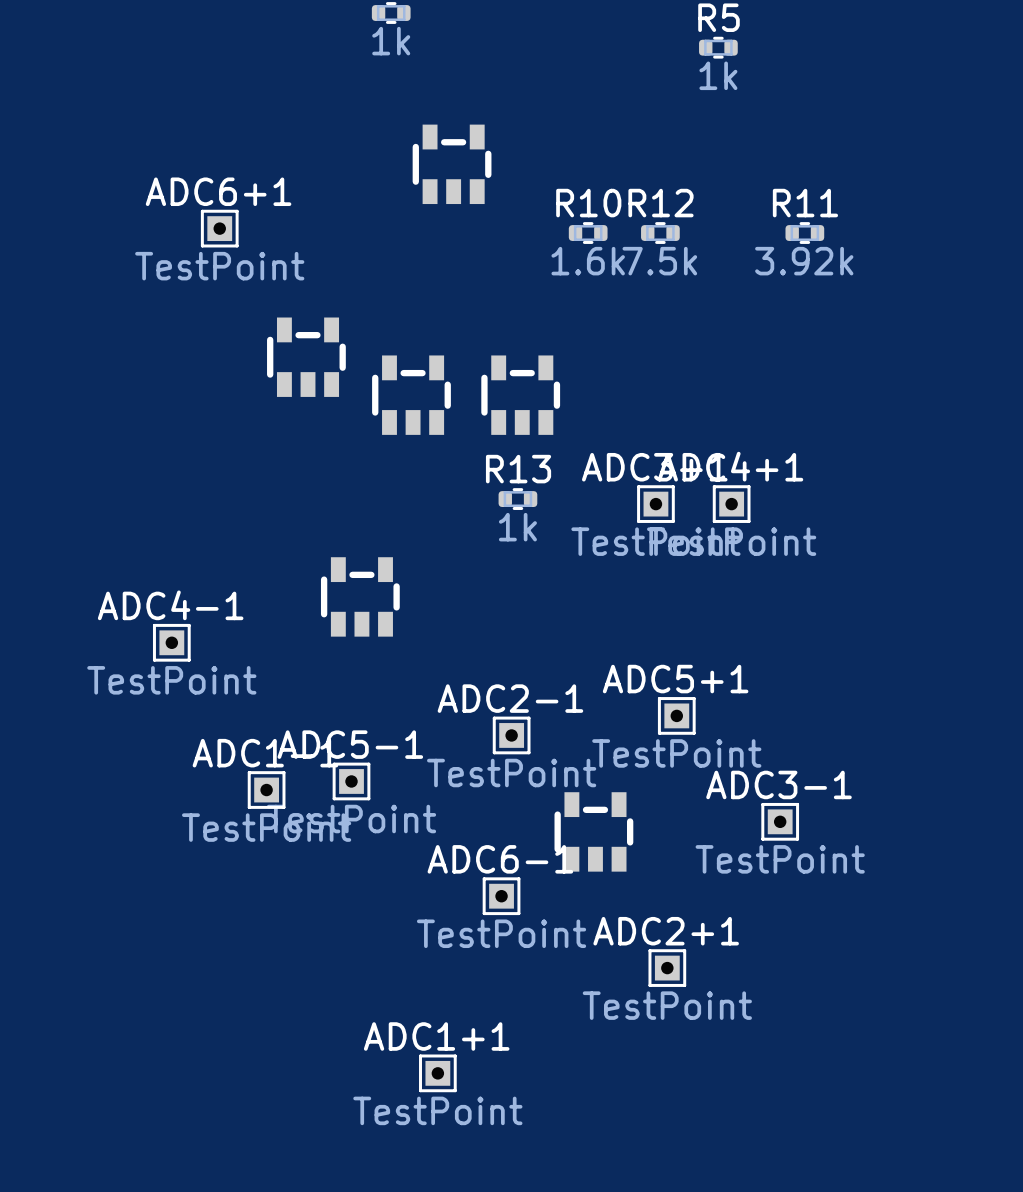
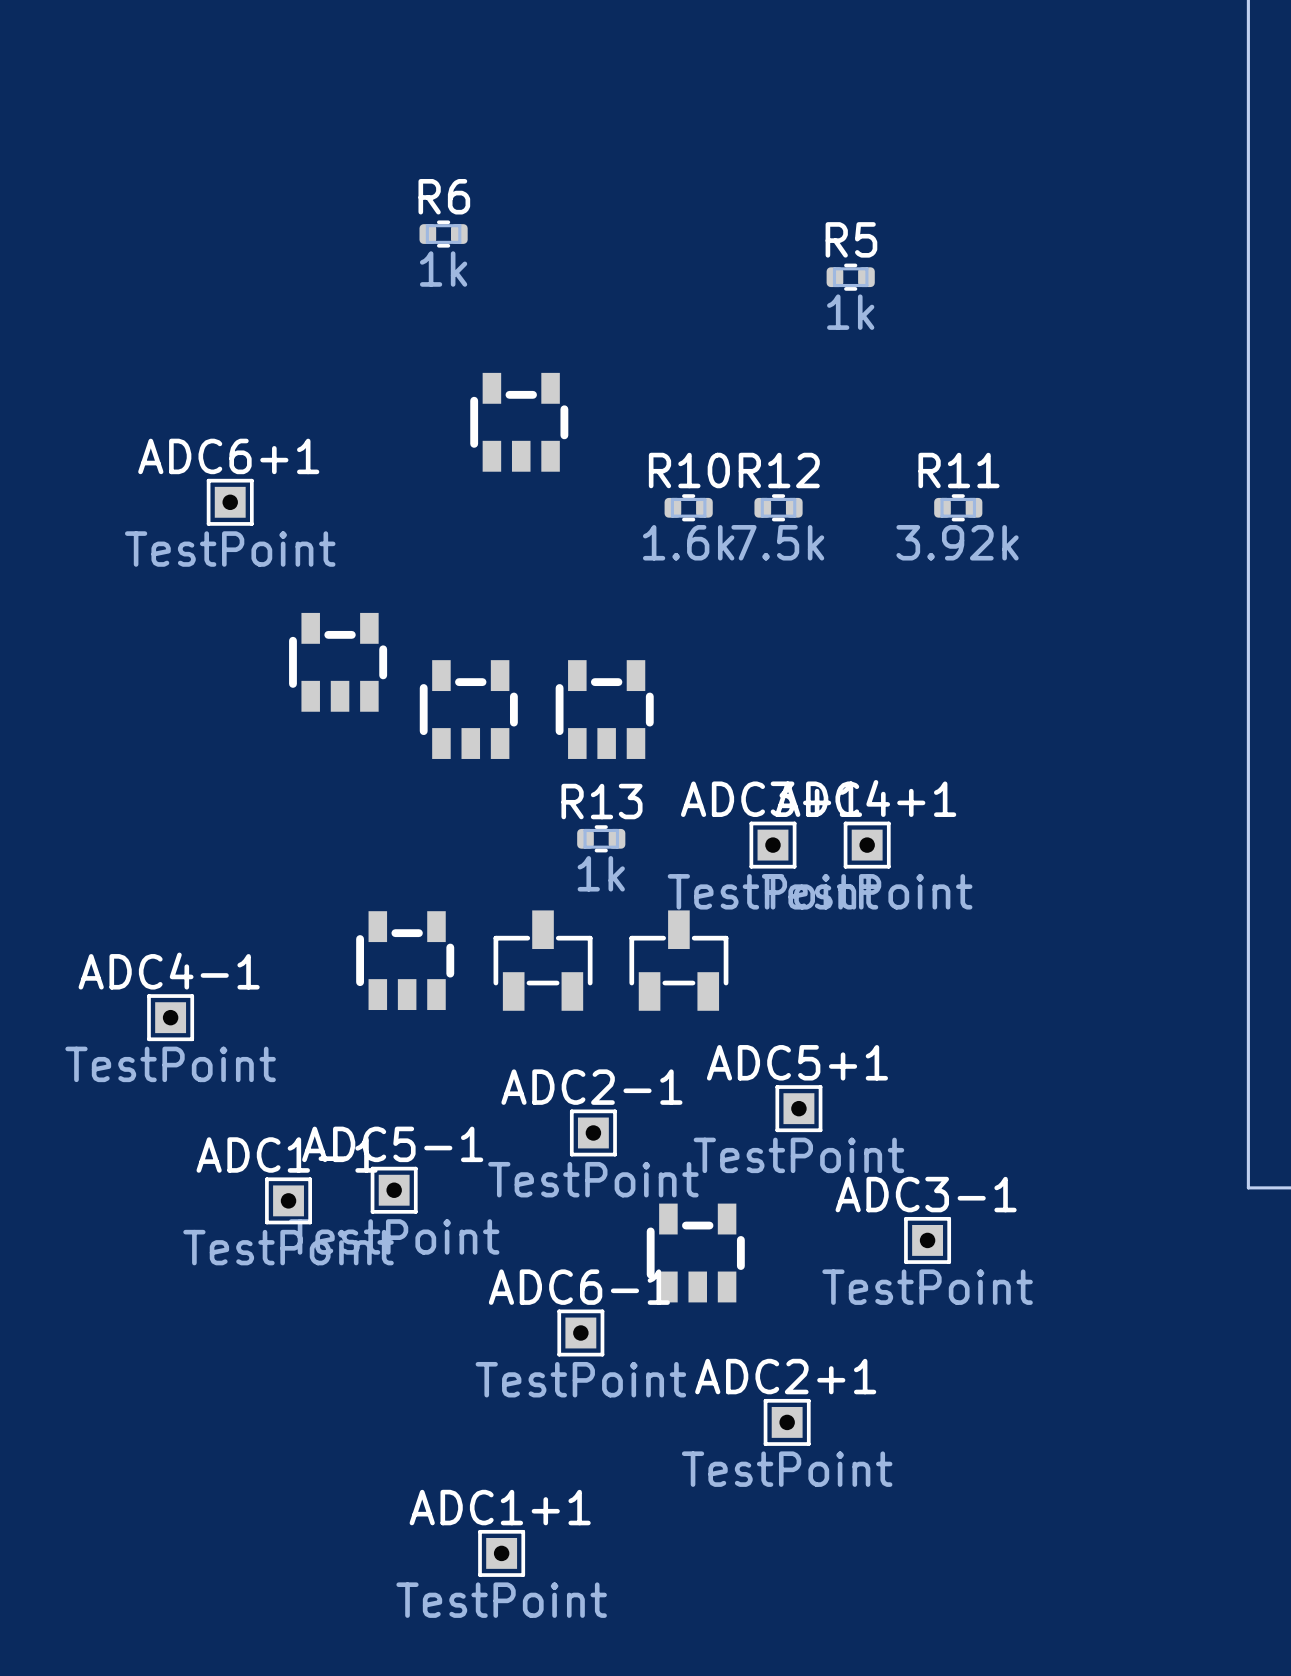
part: none -> (543, 960)
part: none -> (678, 960)

